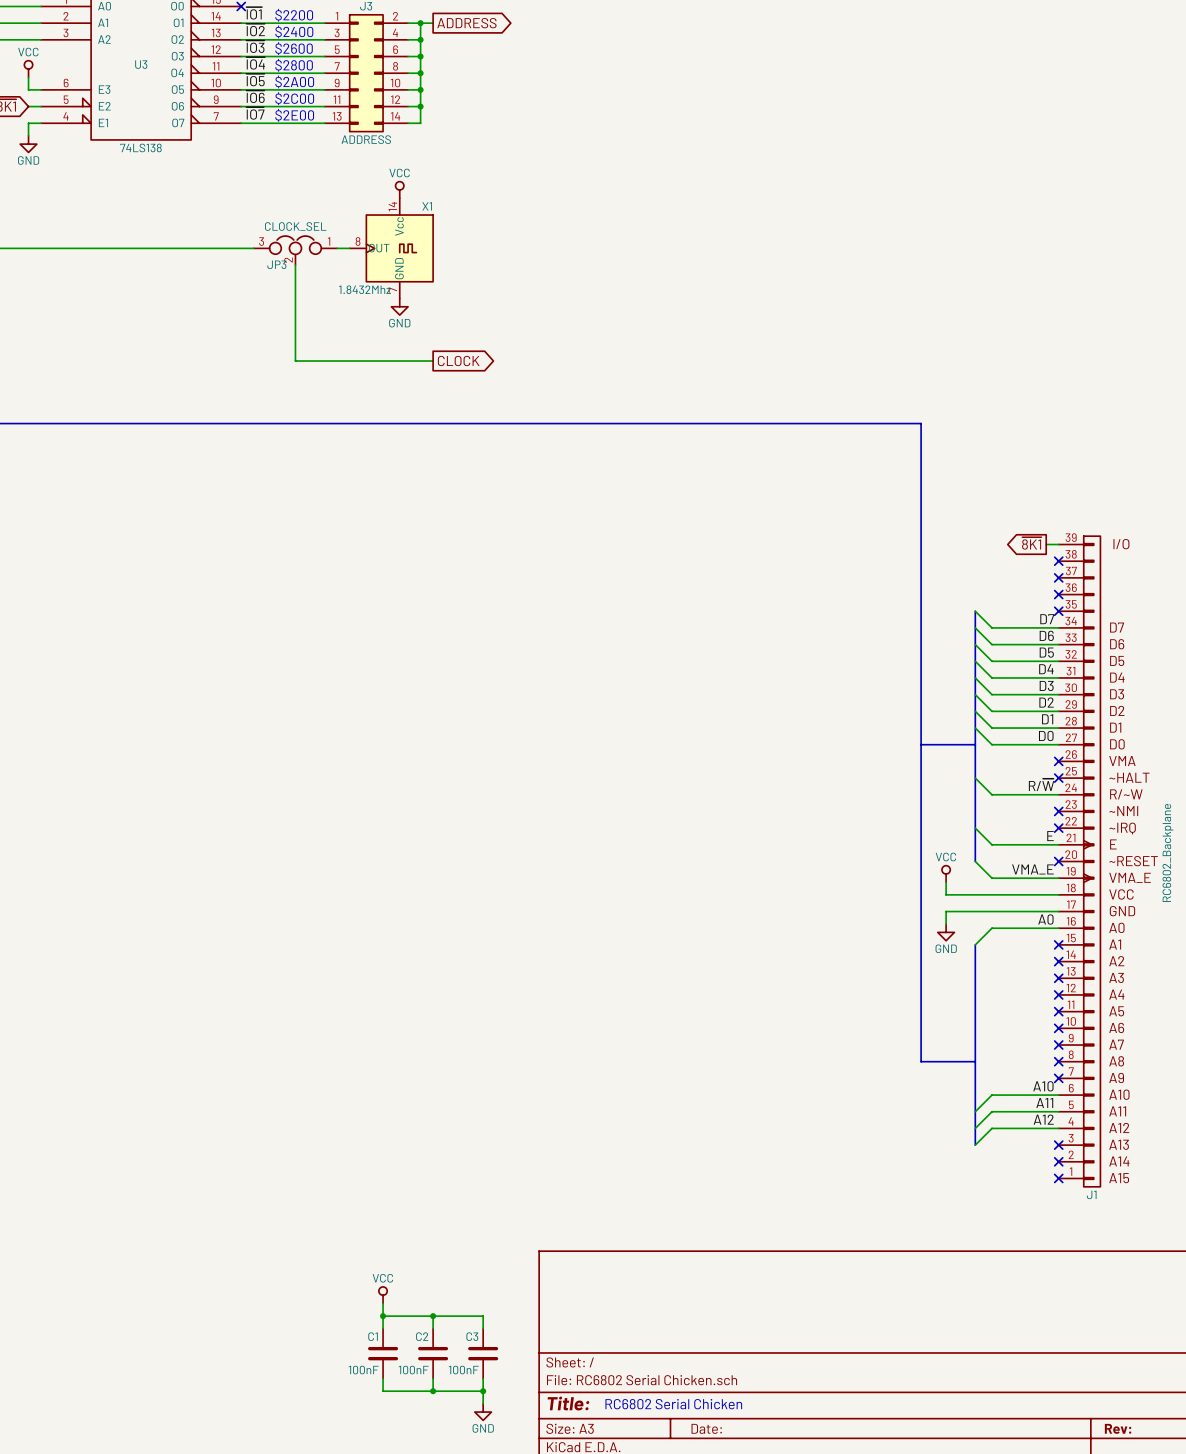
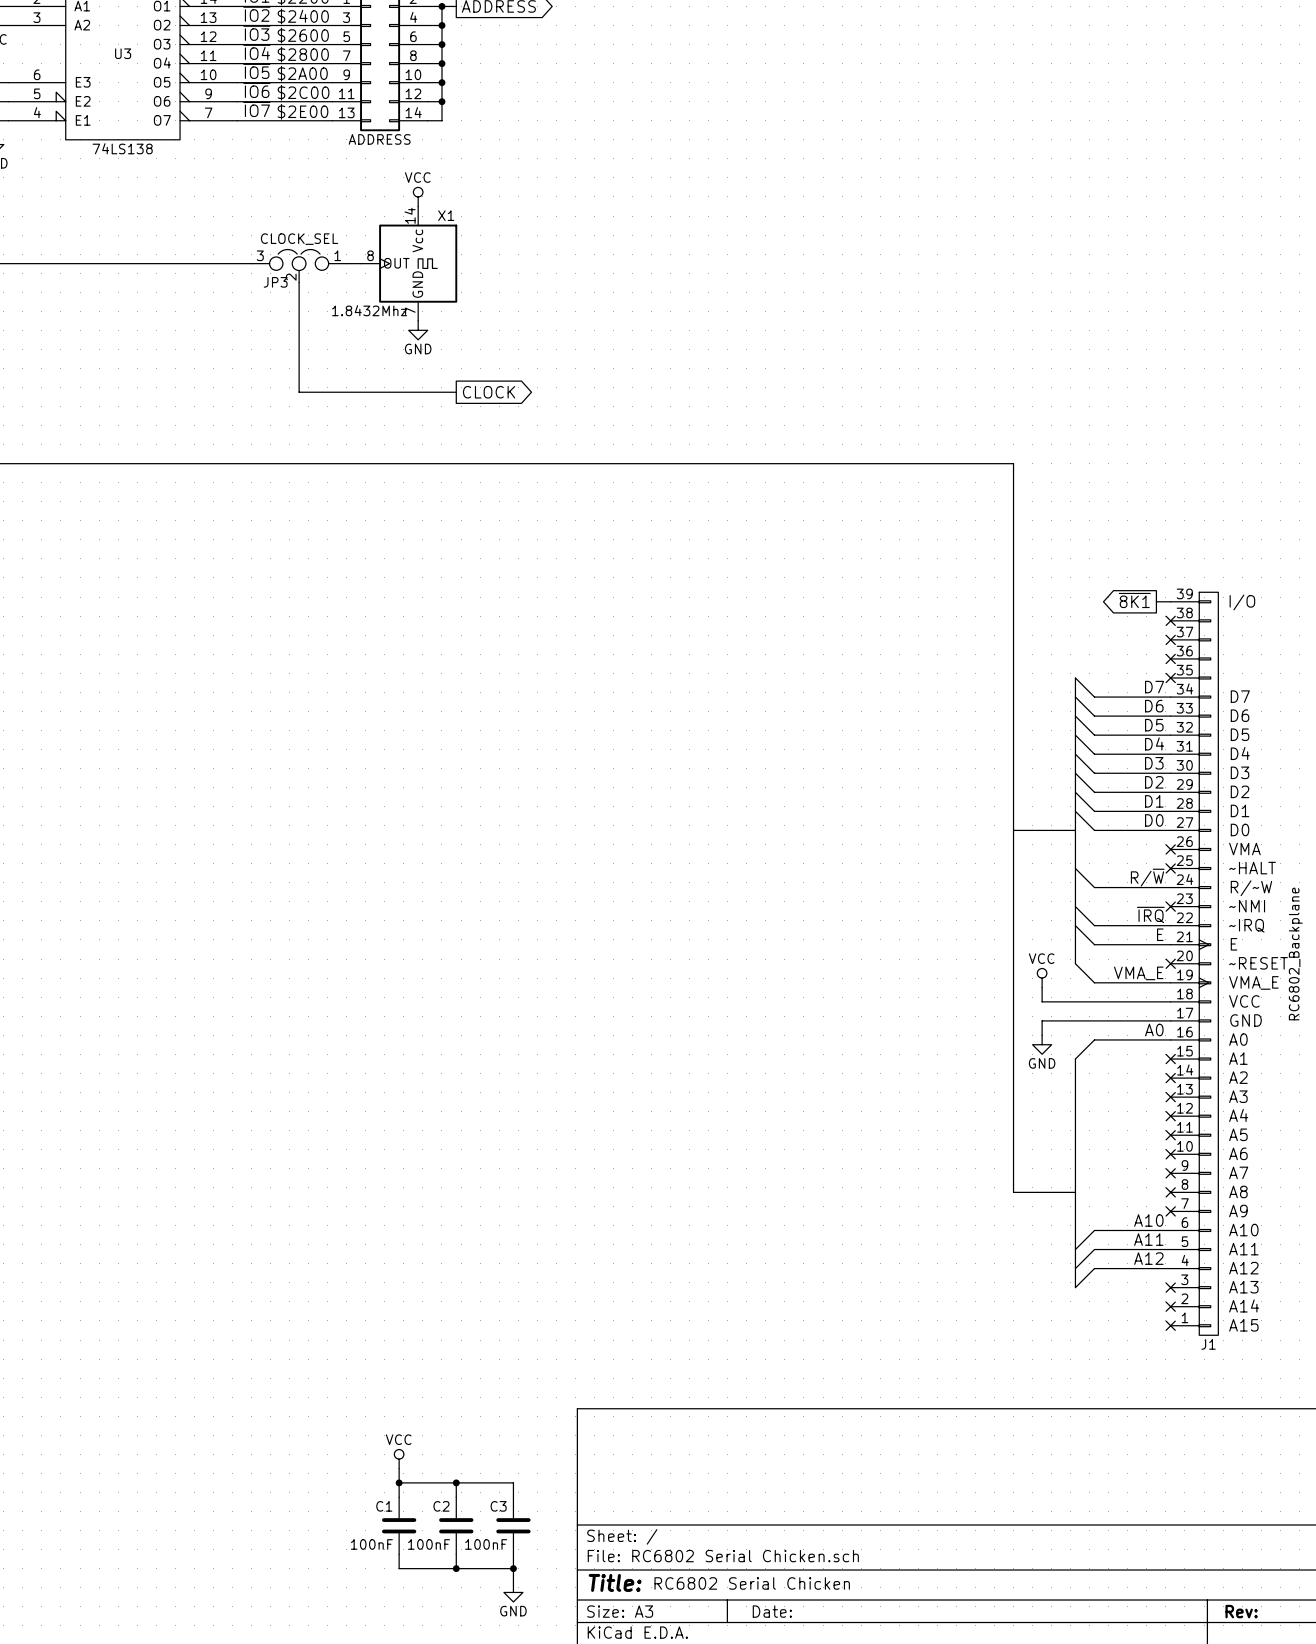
wire: none -> (1075, 906) (1094, 925) (1170, 925)
label: none -> ~{IRQ} (1150, 914)
no-connect mark: (1058, 828) -> none

